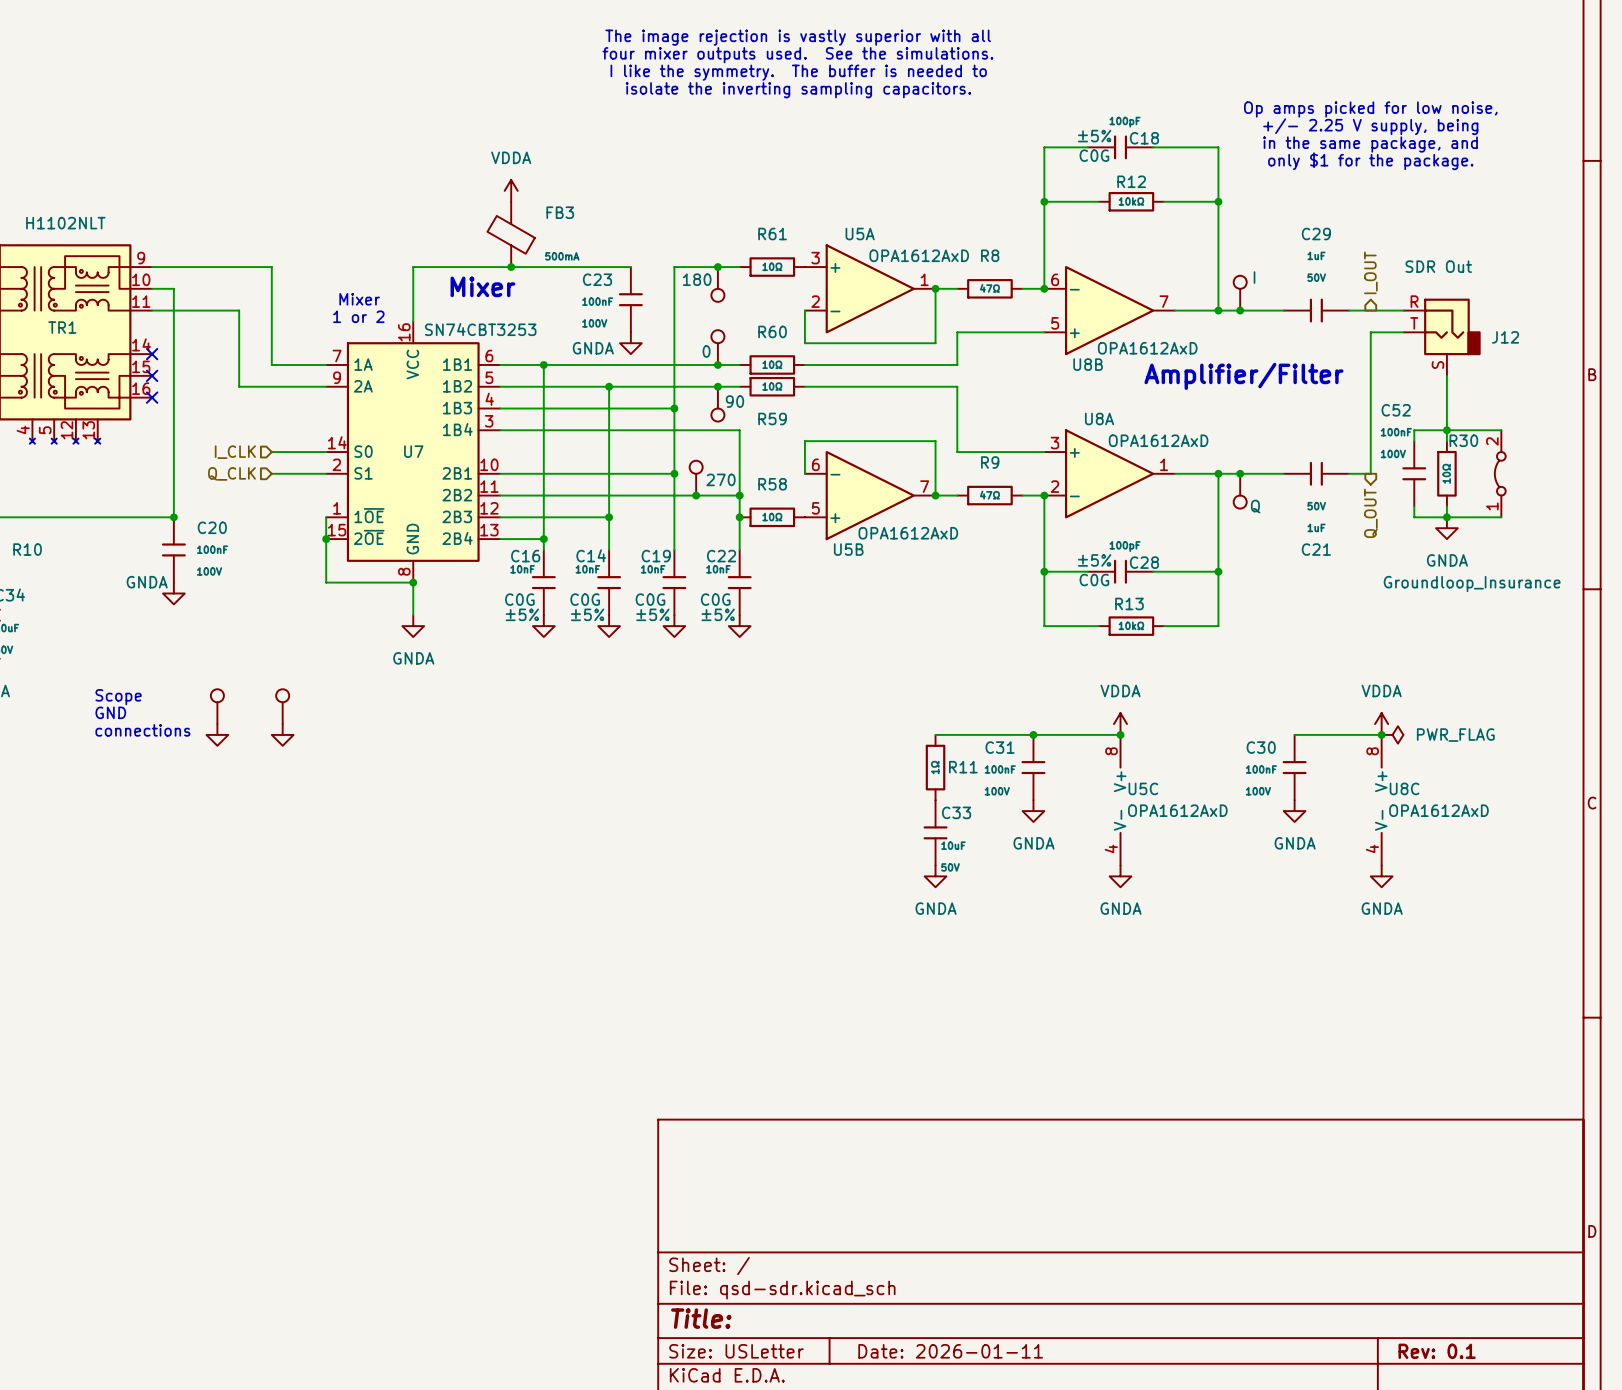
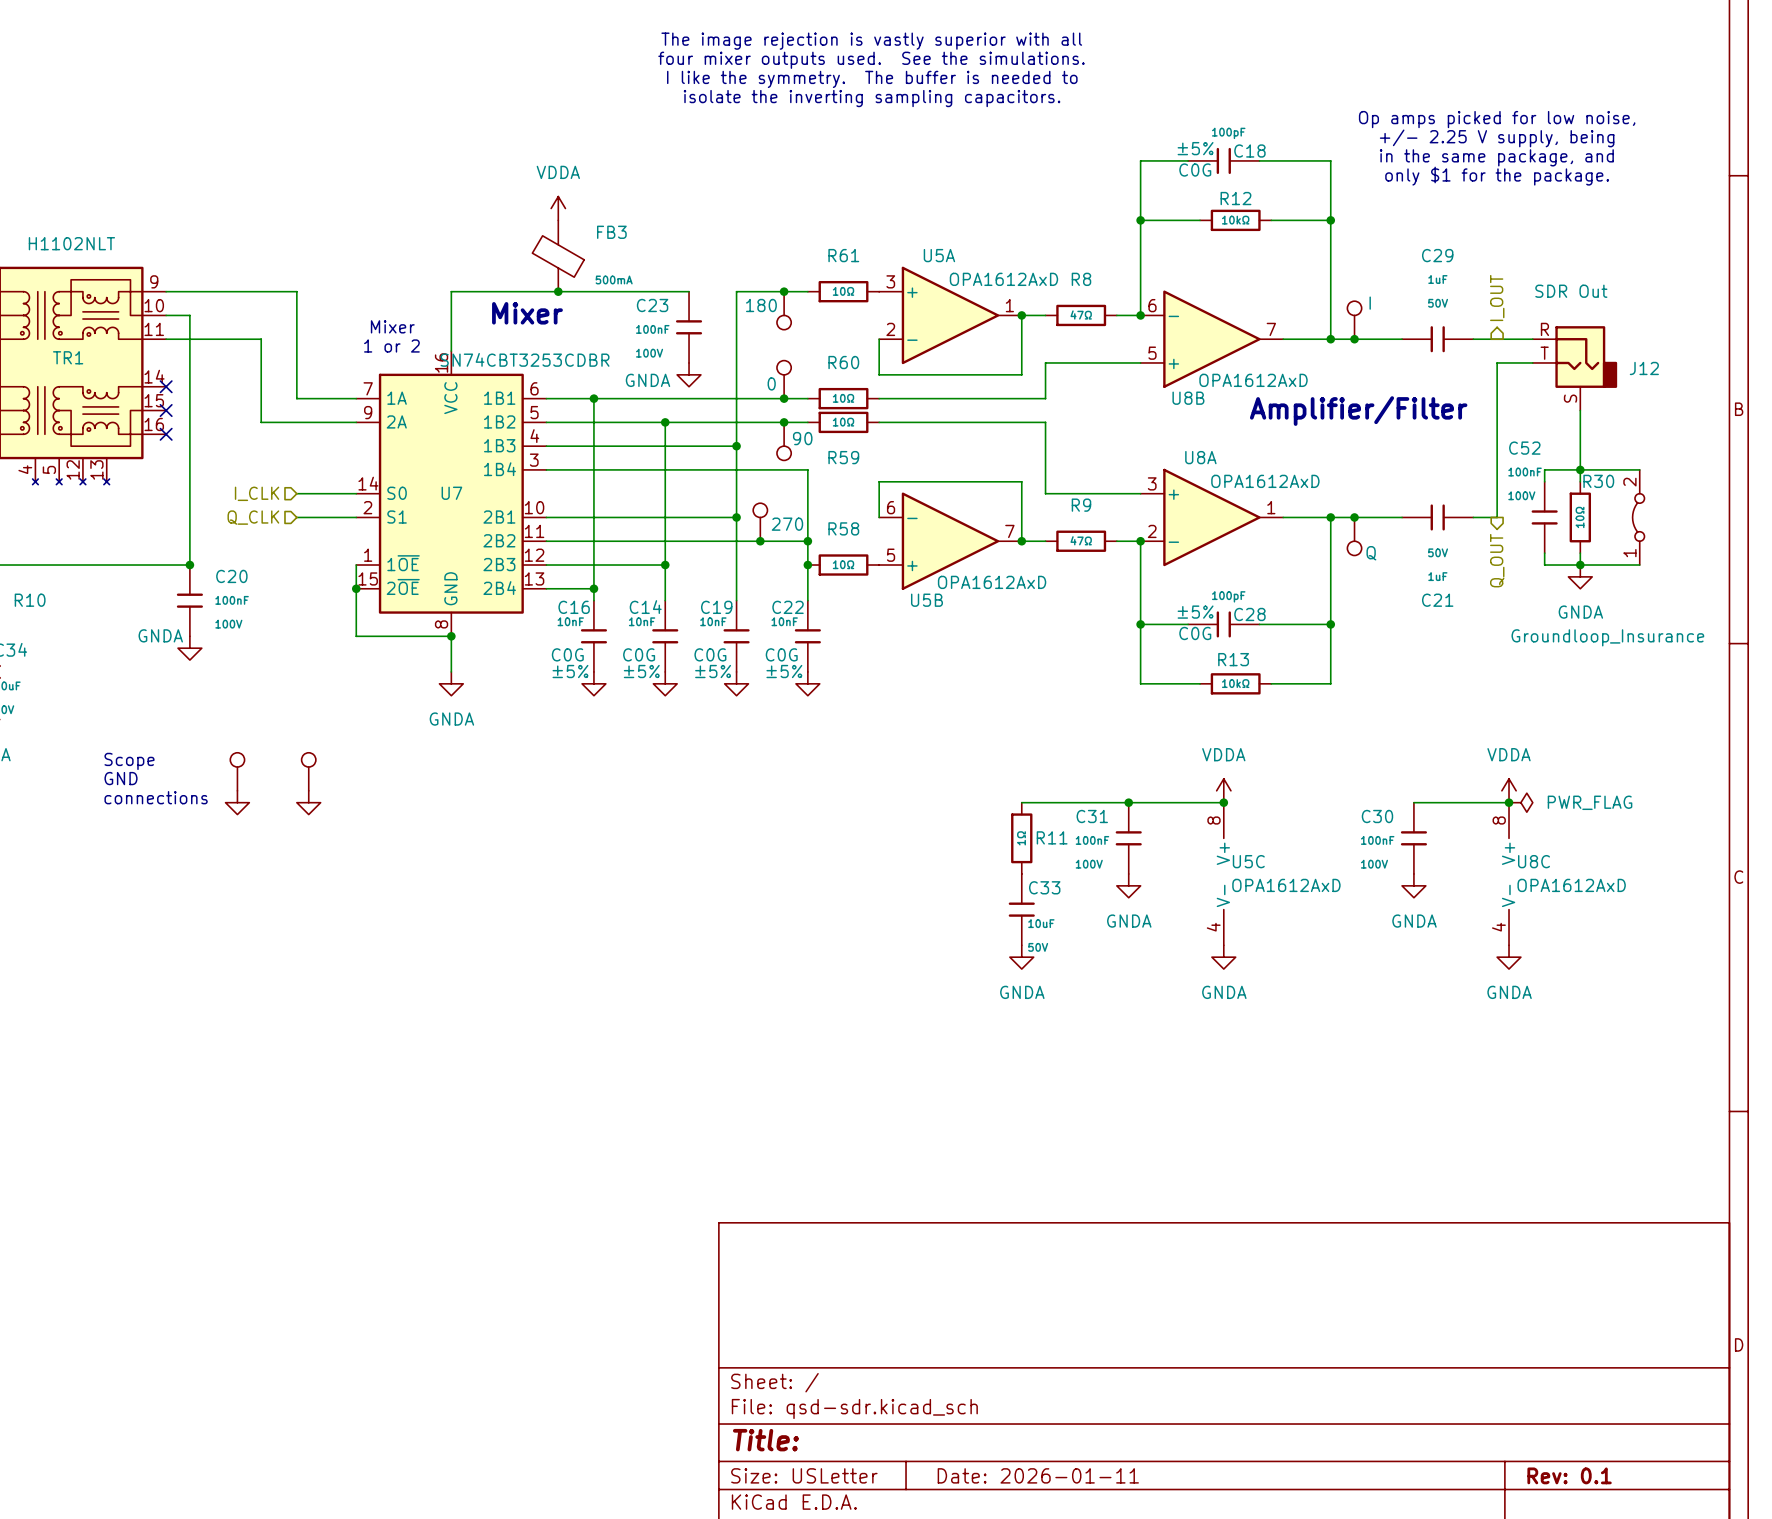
U7 value: SN74CBT3253 (480, 329) -> SN74CBT3253CDBR (525, 359)

